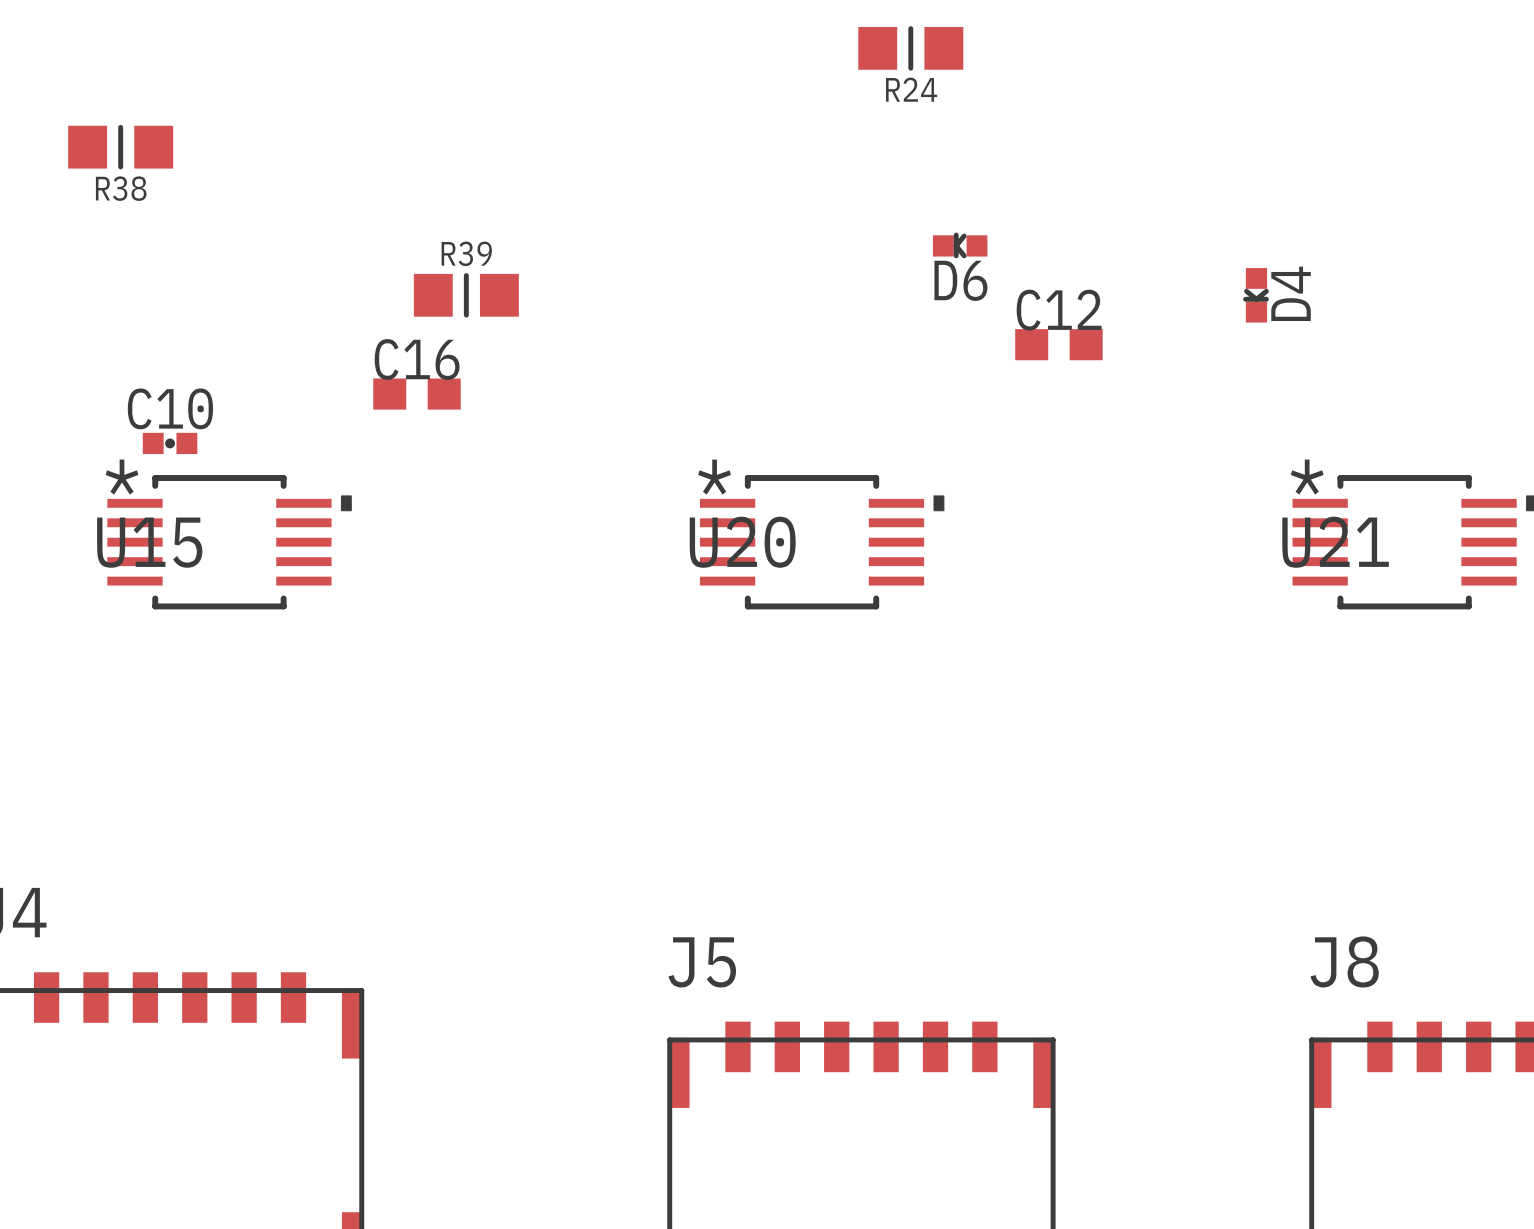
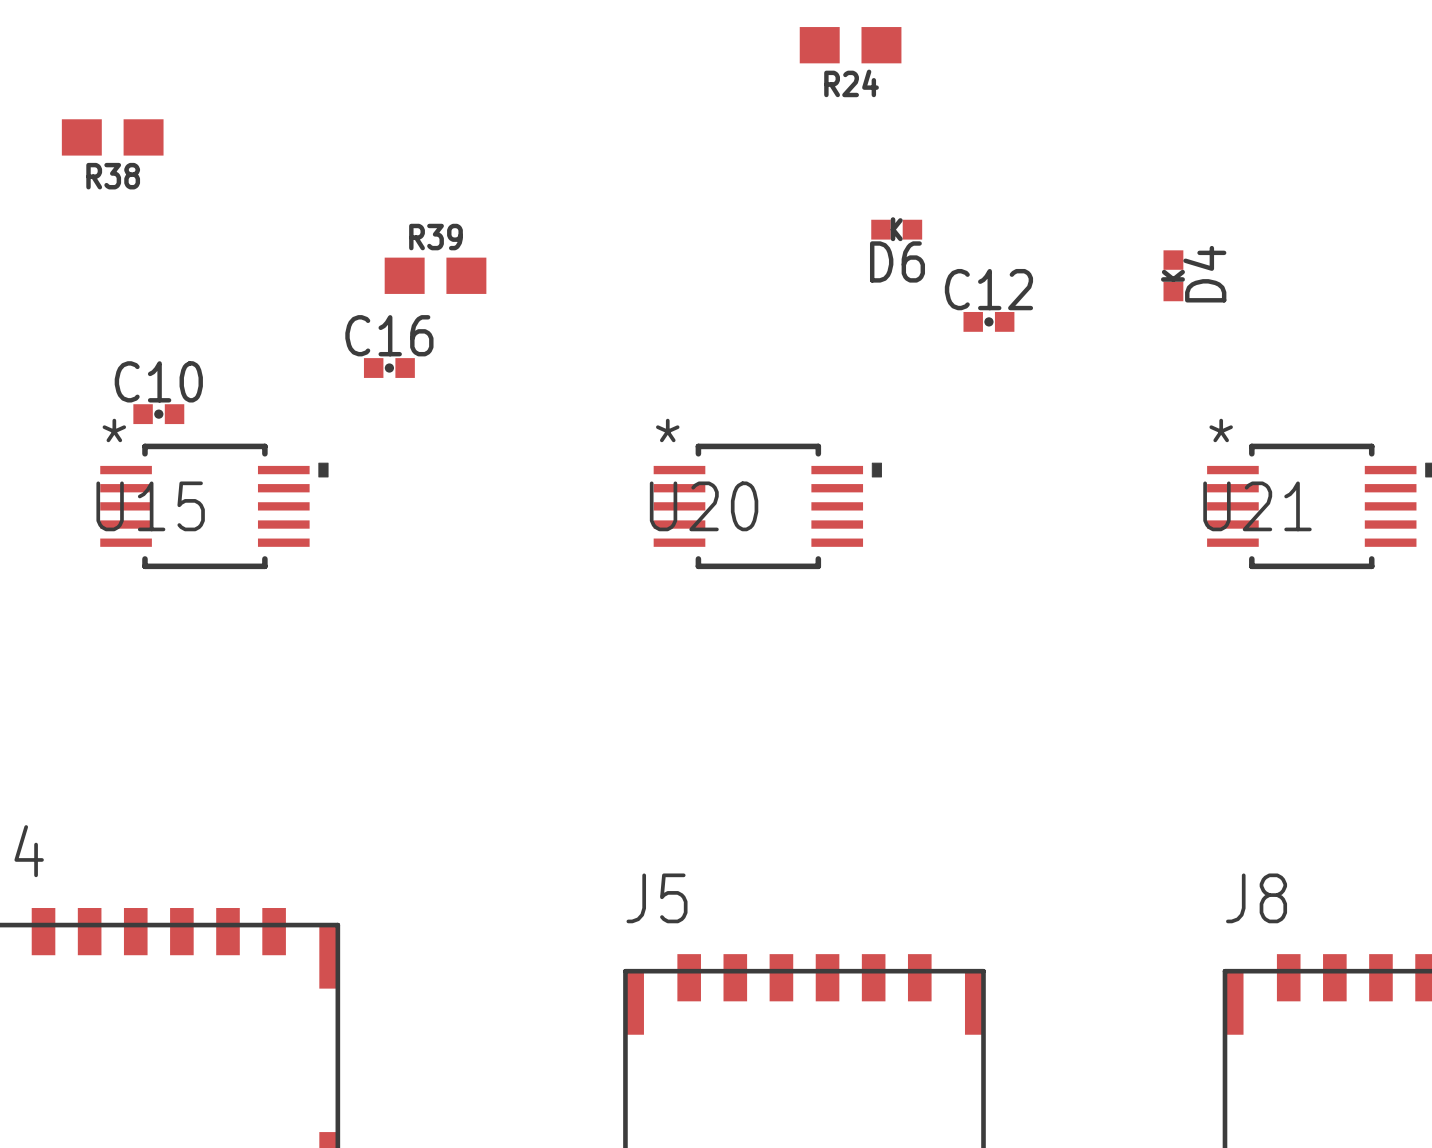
R24 footprint: [858, 26, 964, 71] -> [799, 27, 902, 64]
R38 footprint: [68, 124, 174, 170] -> [61, 119, 164, 156]
R39 footprint: [413, 273, 519, 318] -> [384, 257, 487, 294]
C12 footprint: [1015, 329, 1103, 361] -> [963, 311, 1015, 332]
C16 footprint: [373, 378, 461, 410] -> [363, 358, 415, 378]

